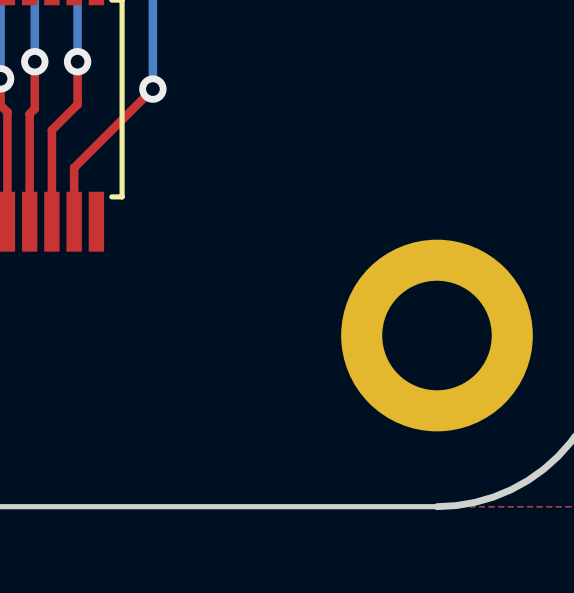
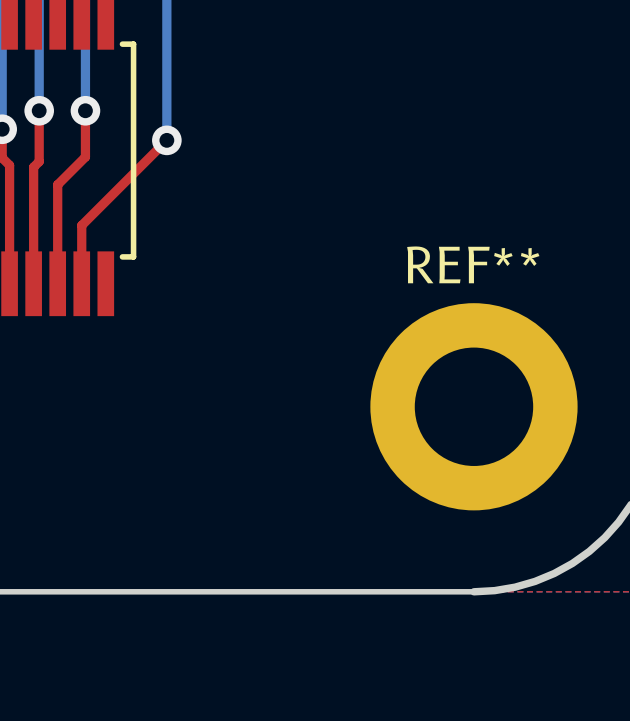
REF** name: none -> REF** (473, 264)

